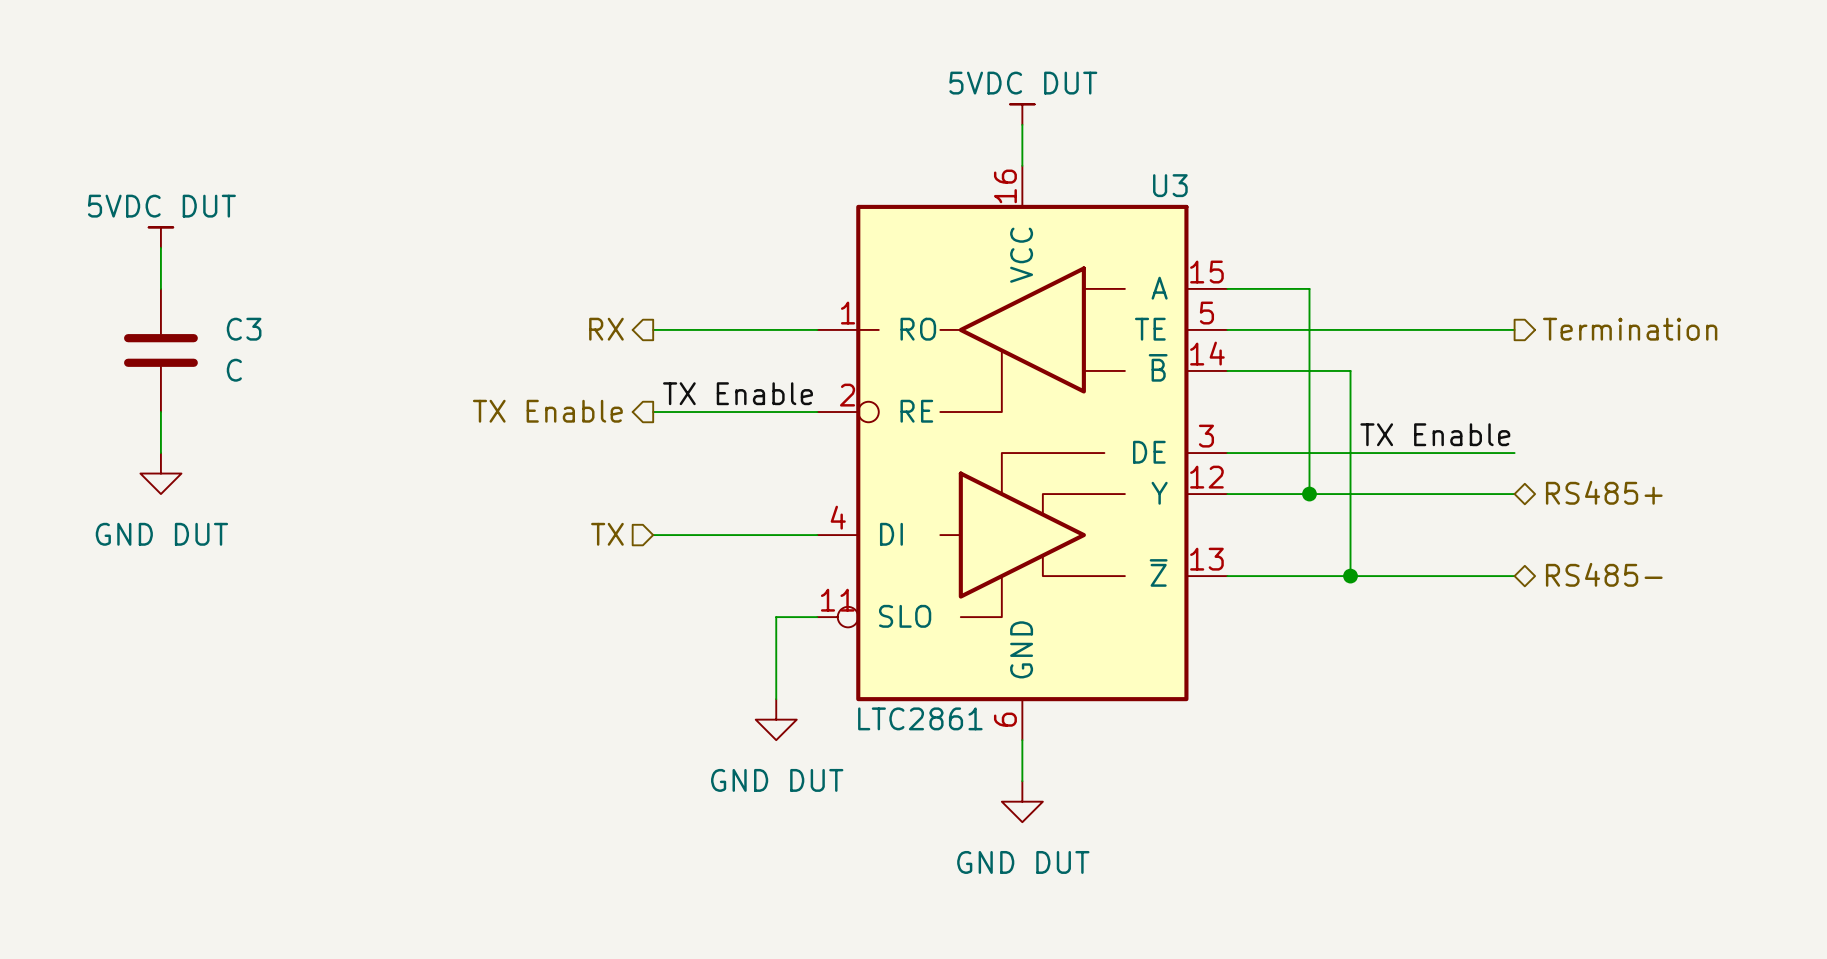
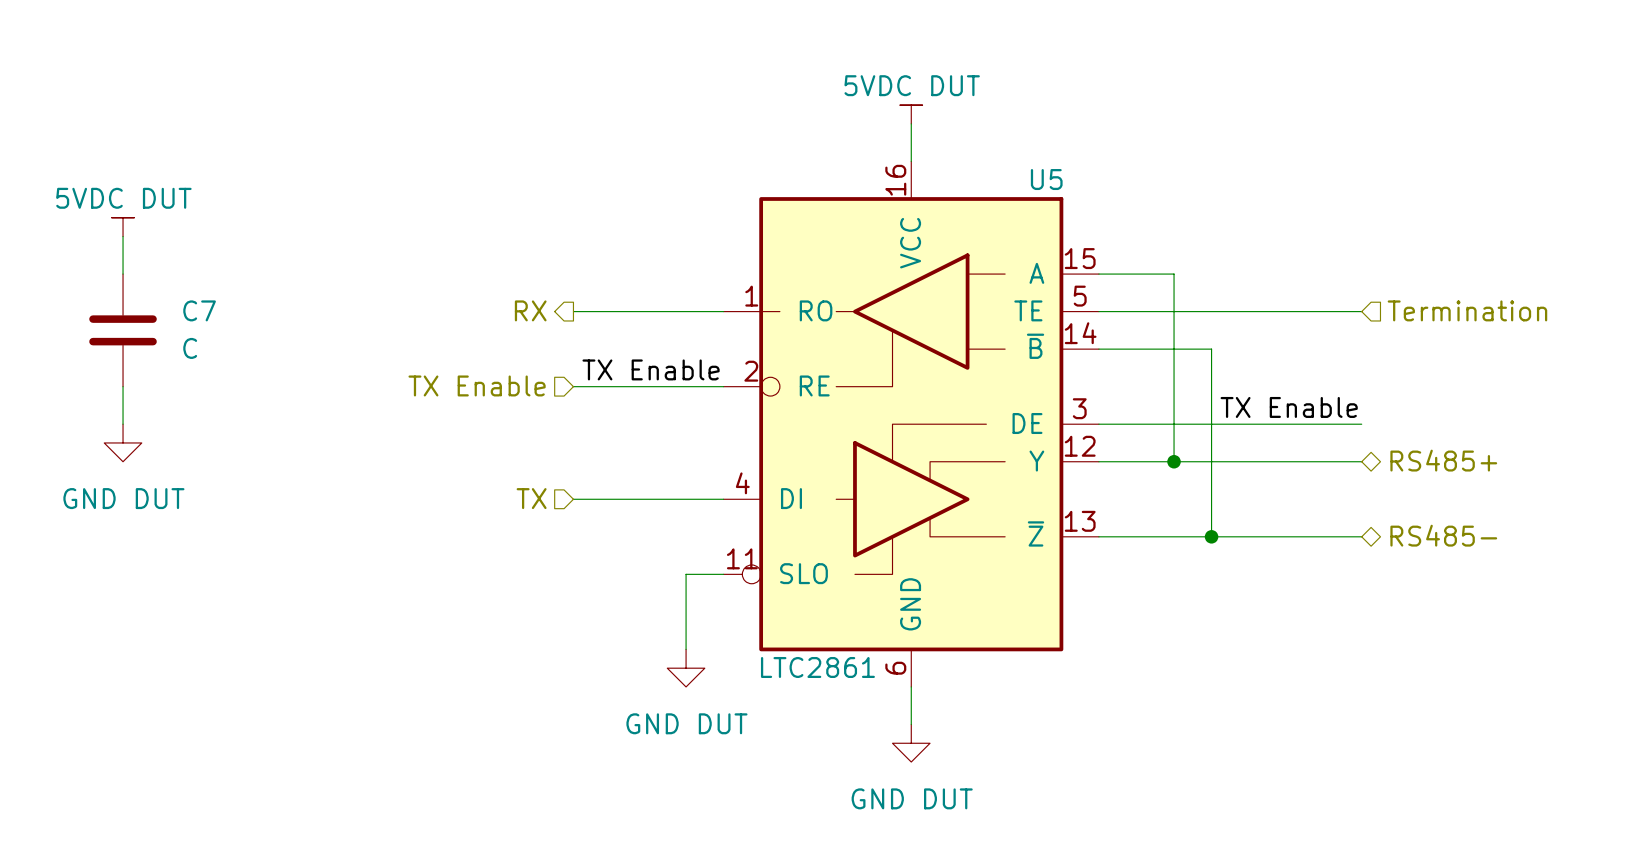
U3 name: U3 (1170, 185) -> U5 (1046, 179)
C3 name: C3 (244, 329) -> C7 (199, 310)
hierarchical label shape: output (1630, 329) -> input (1467, 310)
hierarchical label shape: output (547, 411) -> input (477, 385)

